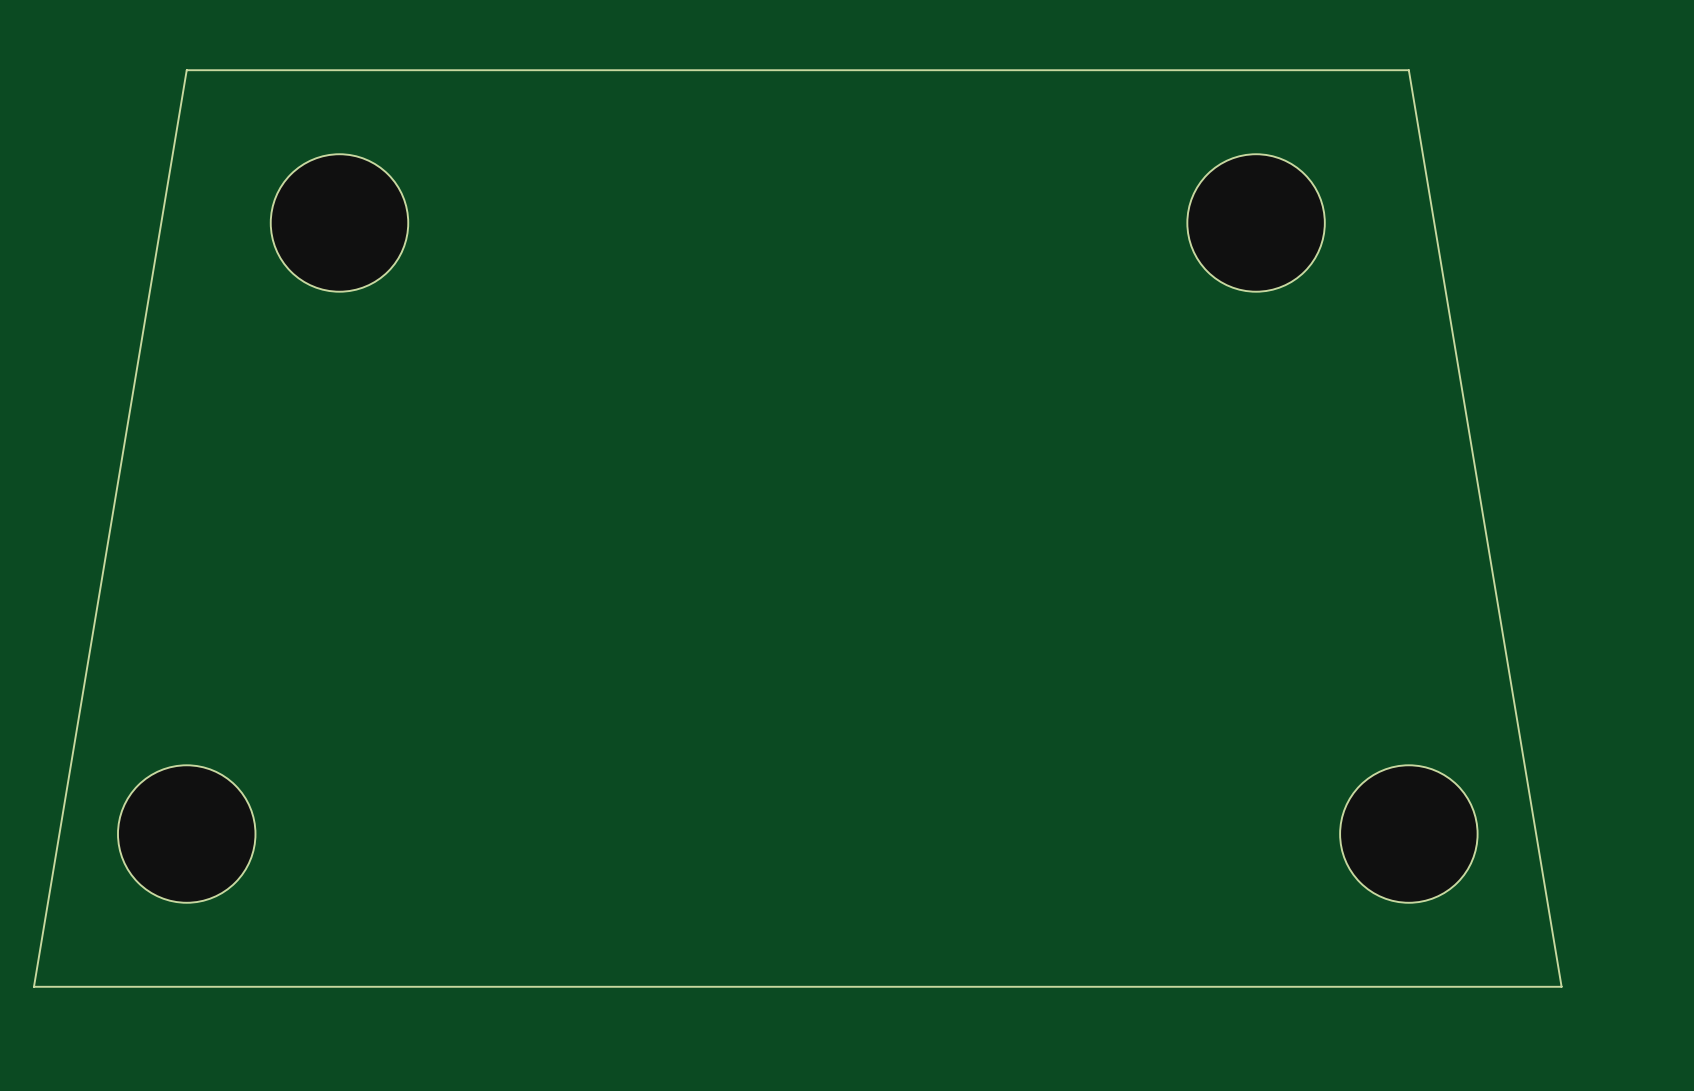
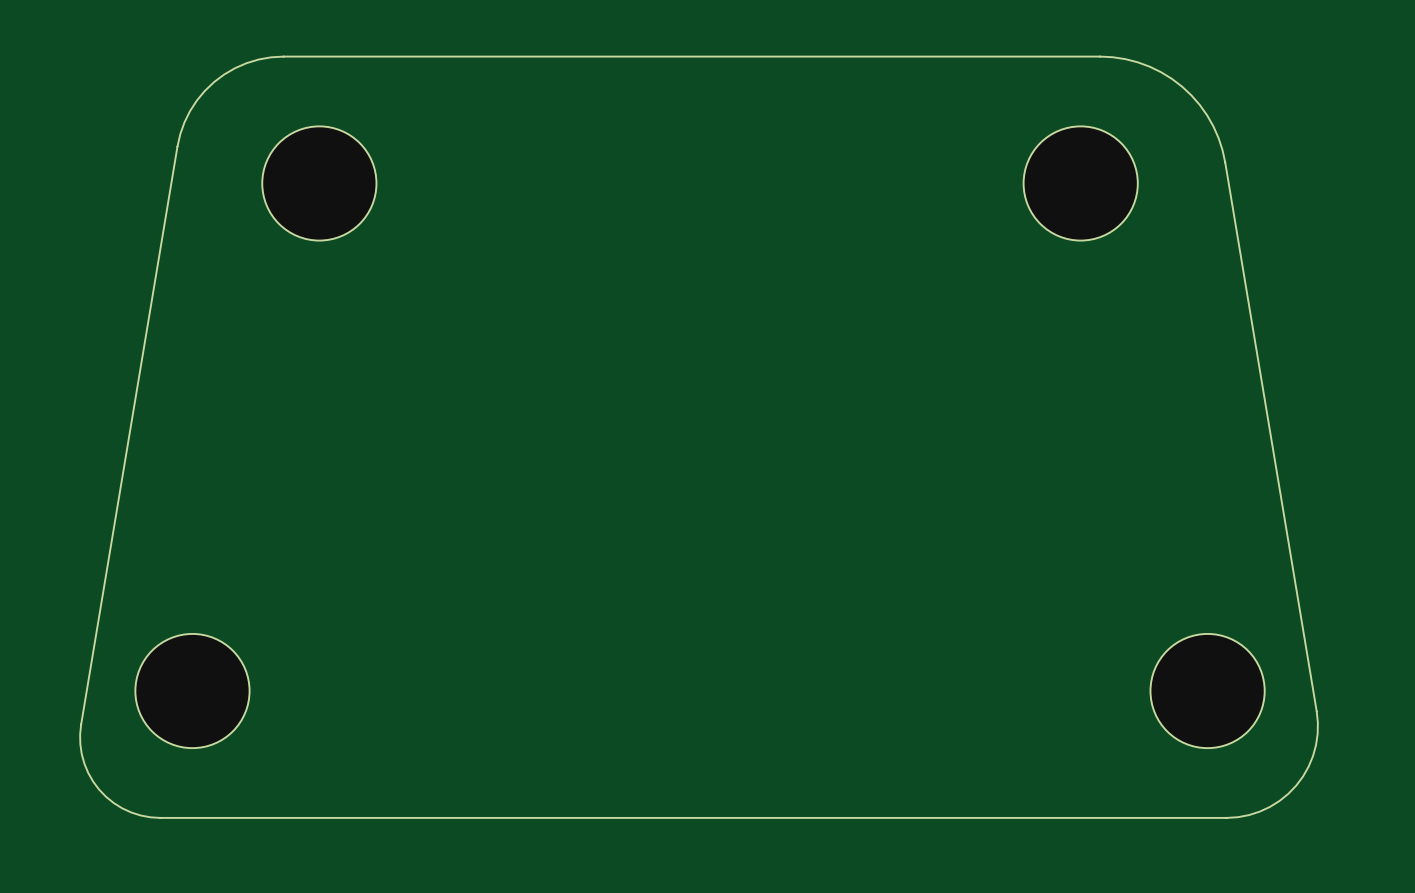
board edge: (296, 70) (186, 70) (168, 178) -> (283, 56) (246, 63) (214, 82) (190, 111) (177, 146)
board edge: (1279, 70) (1408, 70) (1430, 197) -> (1100, 56) (1125, 59) (1149, 66) (1182, 86) (1207, 115) (1218, 138) (1225, 162)
board edge: (1540, 858) (1561, 986) (1431, 986) -> (1316, 711) (1316, 745) (1308, 766) (1296, 785) (1279, 800) (1259, 811) (1226, 817)
board edge: (52, 874) (33, 986) (148, 986) -> (81, 724) (81, 754) (88, 772) (99, 789) (122, 808) (140, 815) (160, 817)

